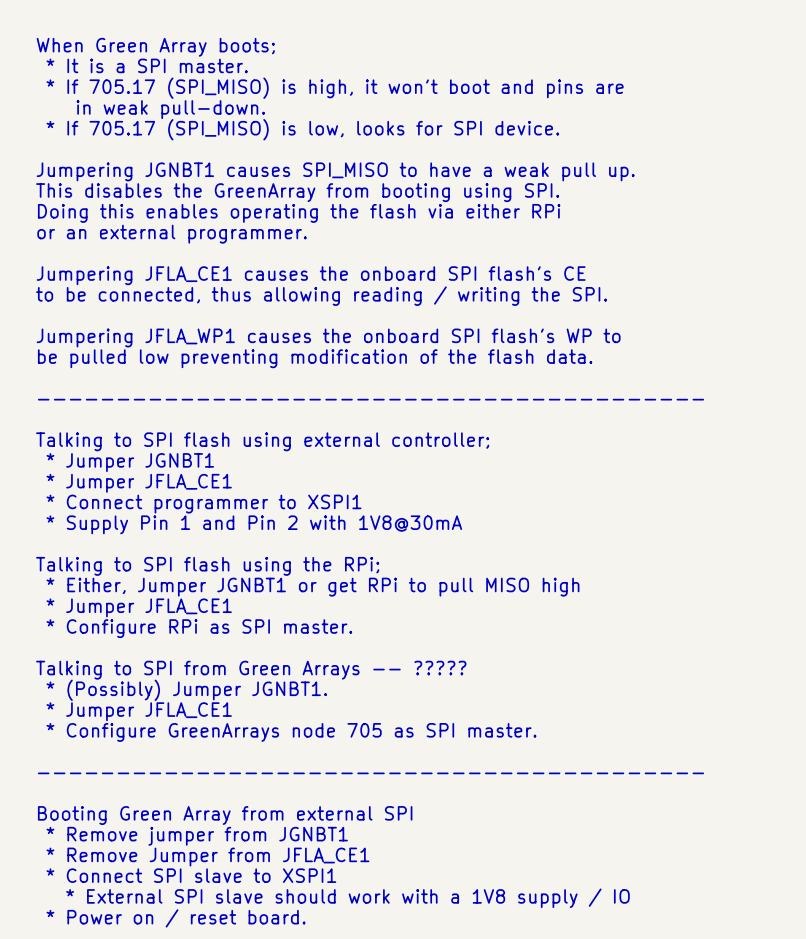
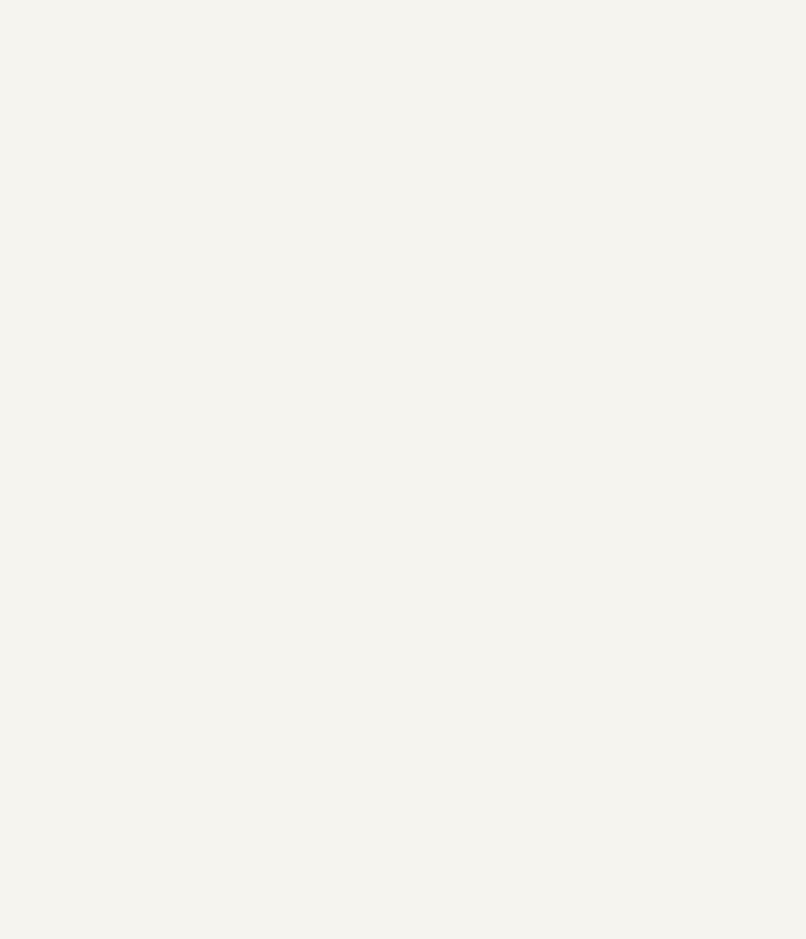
text: When Green Array boots; (155, 47) -> none
text: * It is a SPI master. (147, 65) -> none
text: * If 705.17 (SPI_MISO) is high, it won't boot and pins are (335, 88) -> none
text: in weak pull-down. (170, 109) -> none
text: * If 705.17 (SPI_MISO) is low, looks for SPI device. (302, 129) -> none
text: Jumpering JGNBT1 causes SPI_MISO to have a weak pull up. (335, 171) -> none
text: This disables the GreenArray from booting using SPI. (297, 192) -> none
text: Doing this enables operating the flash via either RPi (299, 213) -> none
text: or an external programmer. (172, 234) -> none
text: Jumpering JFLA_CE1 causes the onboard SPI flash's CE (311, 275) -> none
text: to be connected, thus allowing reading / writing the SPI. (321, 296) -> none
text: Jumpering JFLA_WP1 causes the onboard SPI flash's WP to (328, 337) -> none
text: be pulled low preventing modification of the flash data. (315, 358) -> none
text: ------------------------------------------ (371, 399) -> none
text: Talking to SPI flash using external controller; (262, 441) -> none
text: * Jumper JGNBT1 (130, 462) -> none
text: * Jumper JFLA_CE1 (139, 483) -> none
text: * Connect programmer to XSPI1 (203, 504) -> none
text: * Supply Pin 1 and Pin 2 with 1V8@30mA (254, 524) -> none
text: Talking to SPI flash using the RPi; (207, 566) -> none
text: * Either, Jumper JGNBT1 or get RPi to pull MISO high (312, 587) -> none
text: * Jumper JFLA_CE1 (139, 607) -> none
text: * Configure RPi as SPI master. (199, 628) -> none
text: Talking to SPI from Green Arrays -- ????? (251, 670) -> none
text: * (Possibly) Jumper JGNBT1. (186, 690) -> none
text: * Jumper JFLA_CE1 (139, 711) -> none
text: * Configure GreenArrays node 705 as SPI master. (291, 732) -> none
text: ------------------------------------------ (371, 773) -> none
text: Booting Green Array from external SPI (225, 815) -> none
text: * Remove jumper from JGNBT1 (197, 836) -> none
text: * Remove Jumper from JFLA_CE1 (207, 857) -> none
text: * Connect SPI slave to XSPI1 (191, 875) -> none
text: * External SPI slave should work with a 1V8 supply / IO (347, 898) -> none
text: * Power on / reset board. (176, 918) -> none

